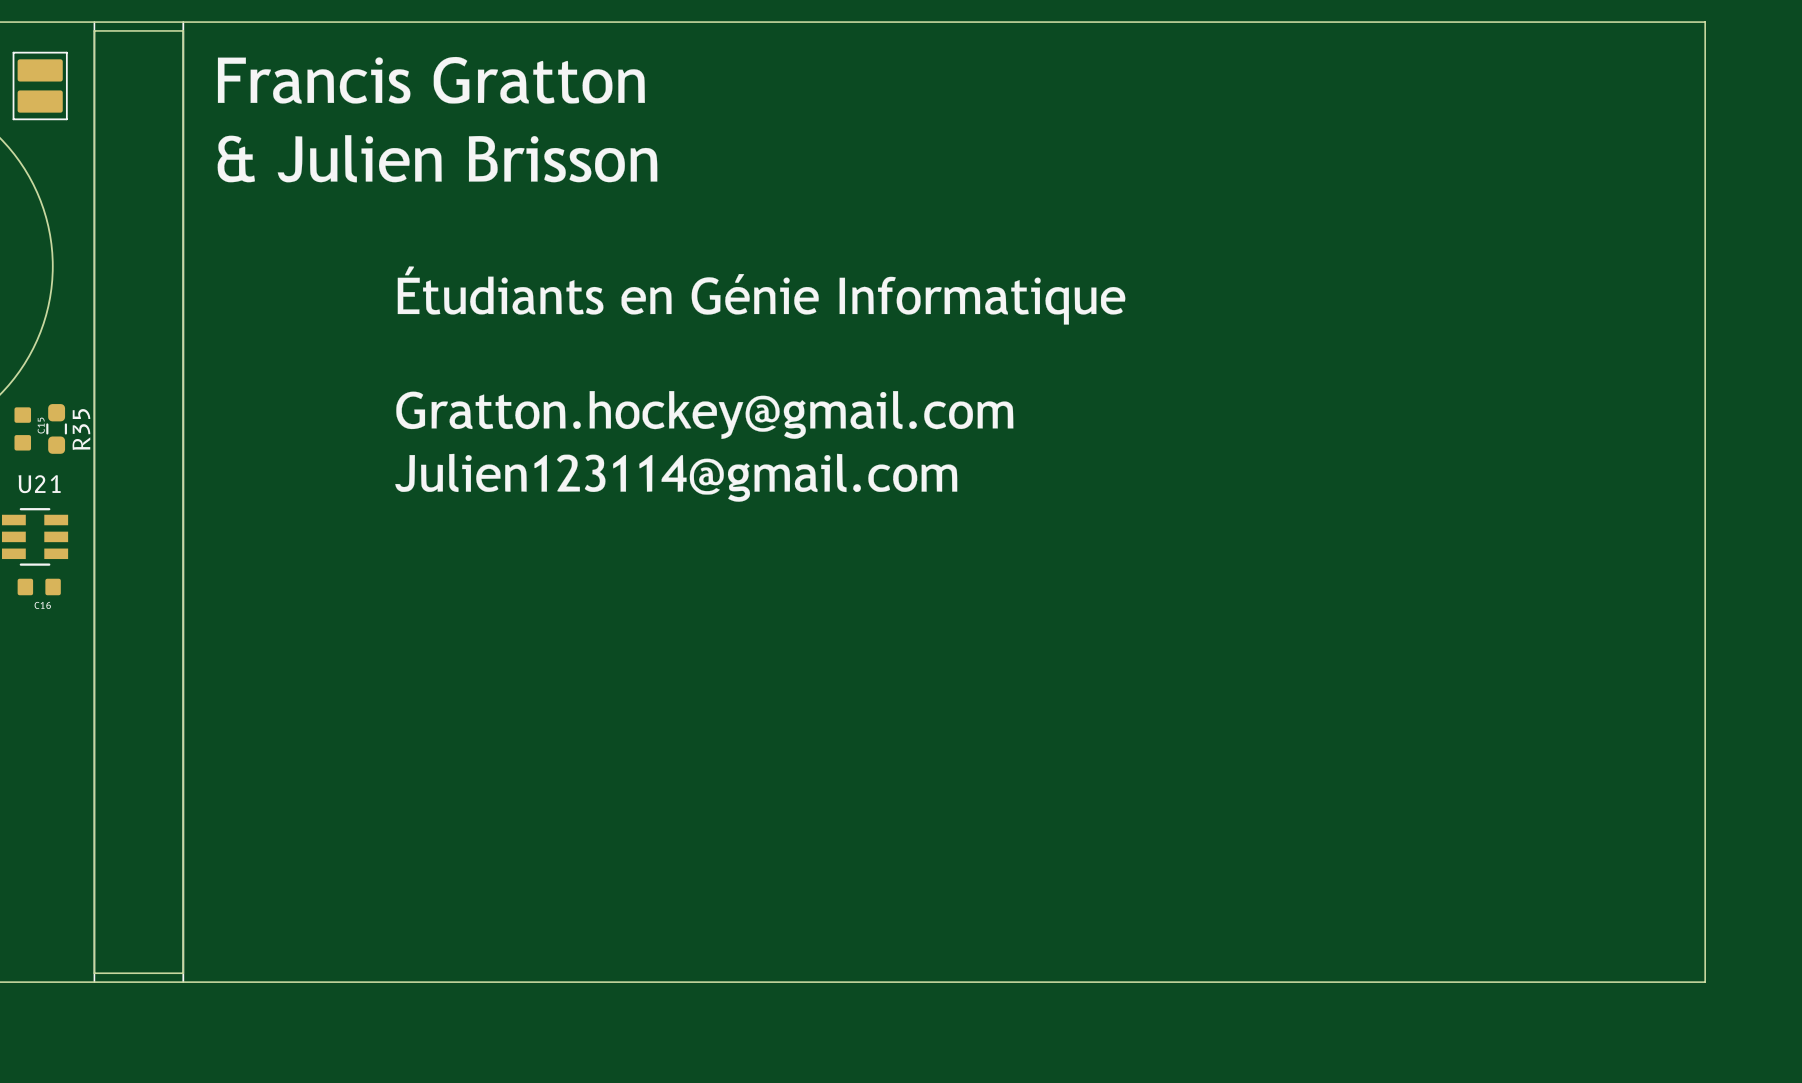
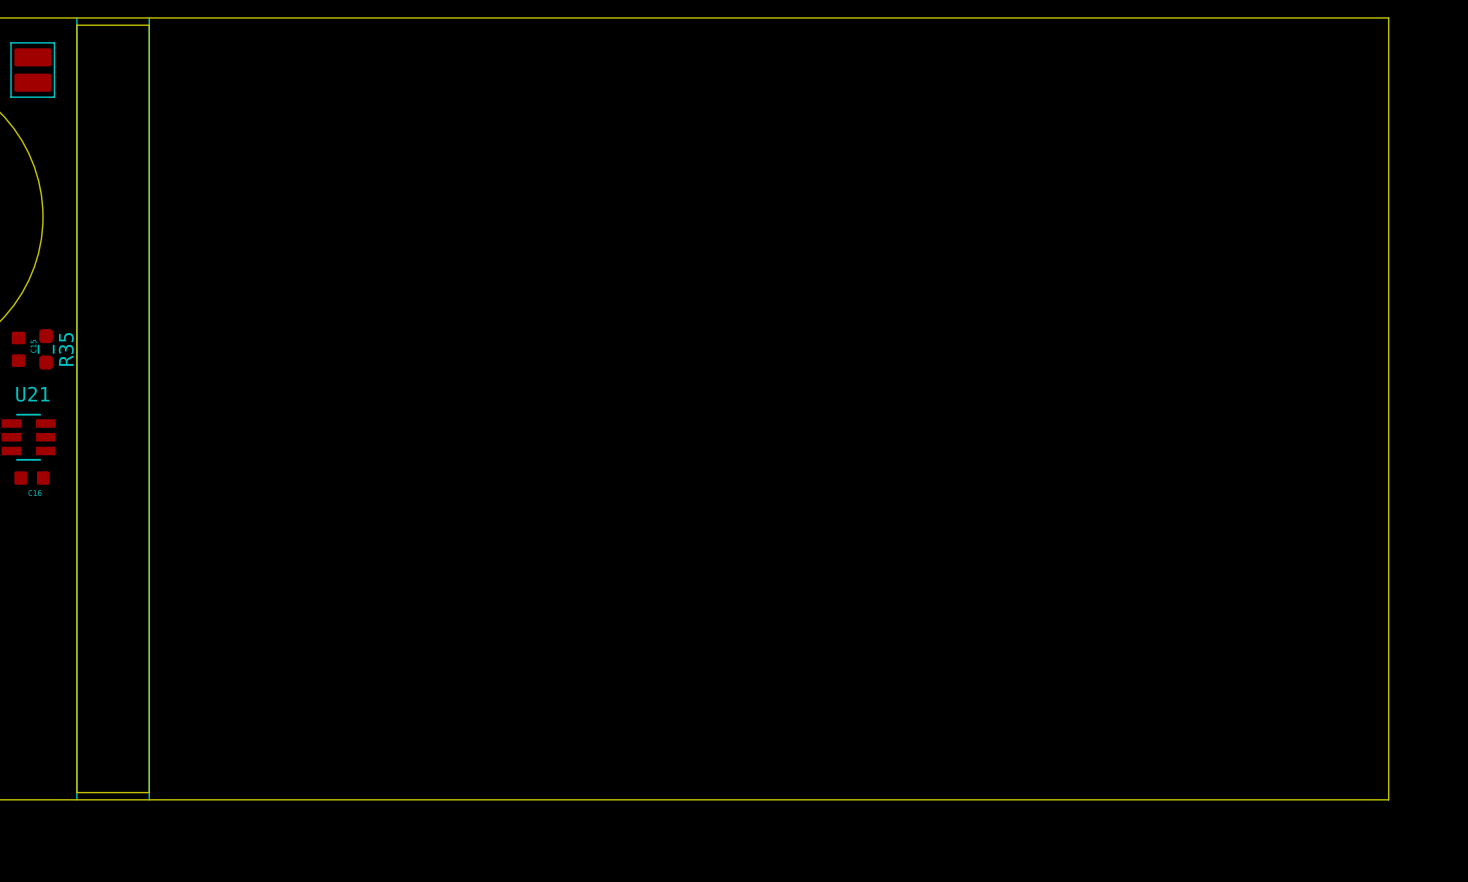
drawing: [217, 56, 1126, 502] -> none

